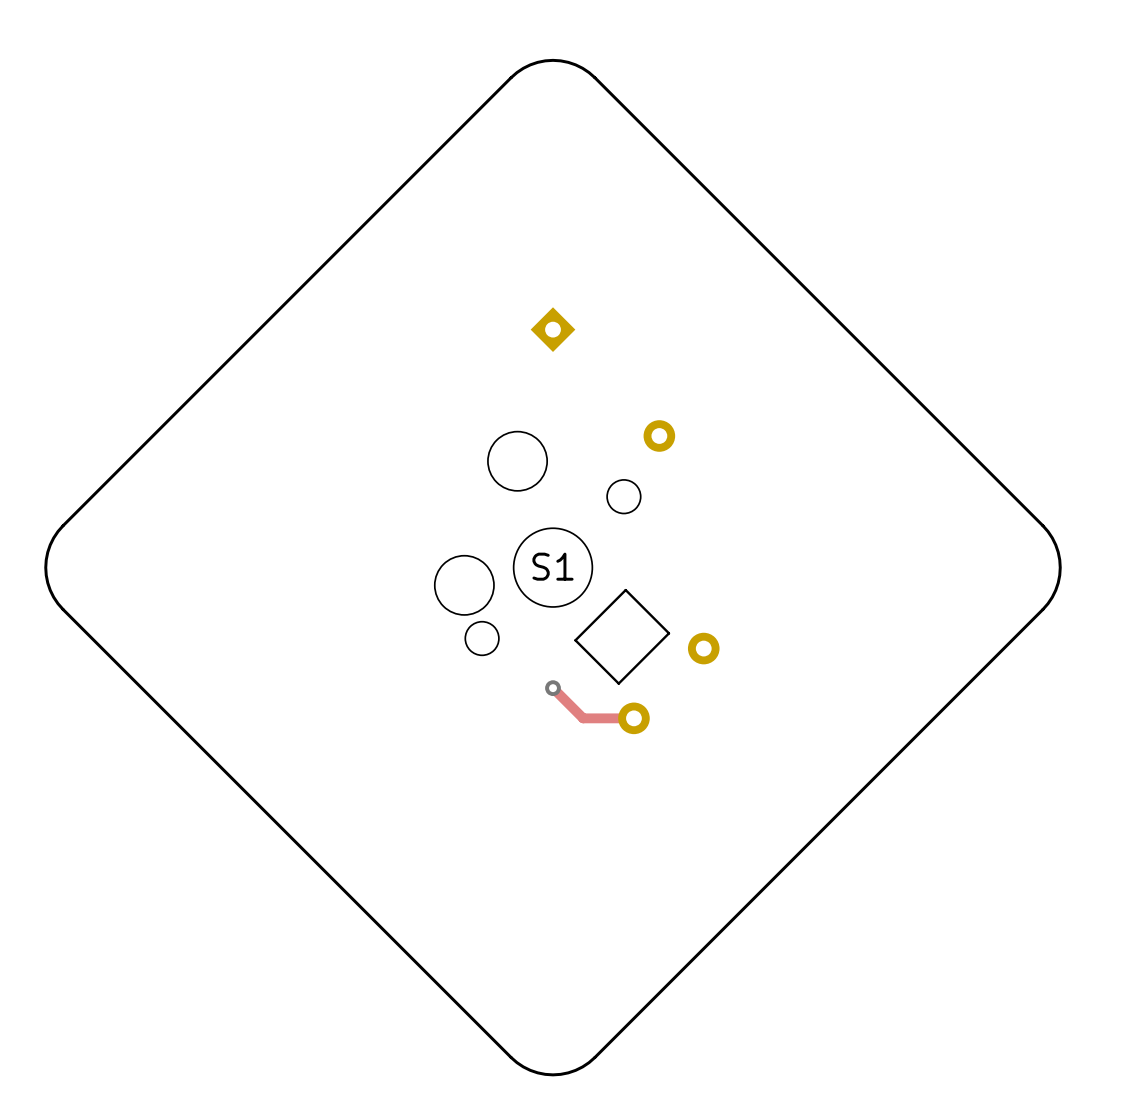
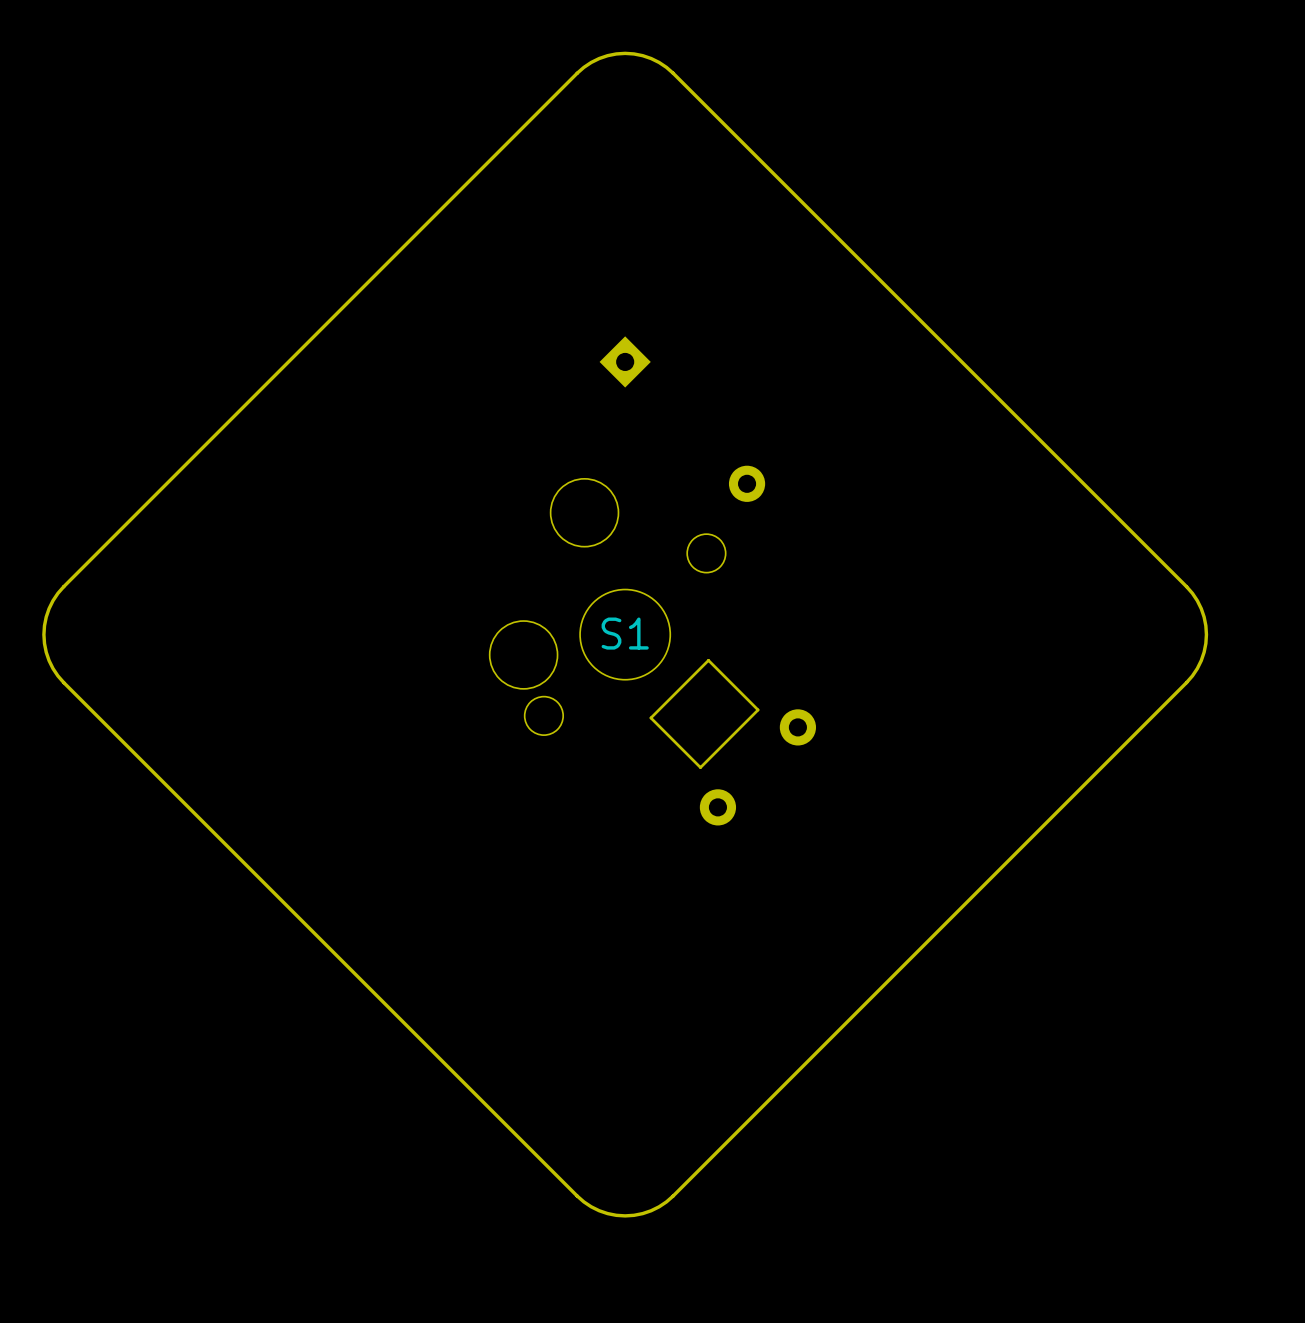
track: (553, 688) (583, 718) (633, 718) -> none
via: (553, 688) -> none

